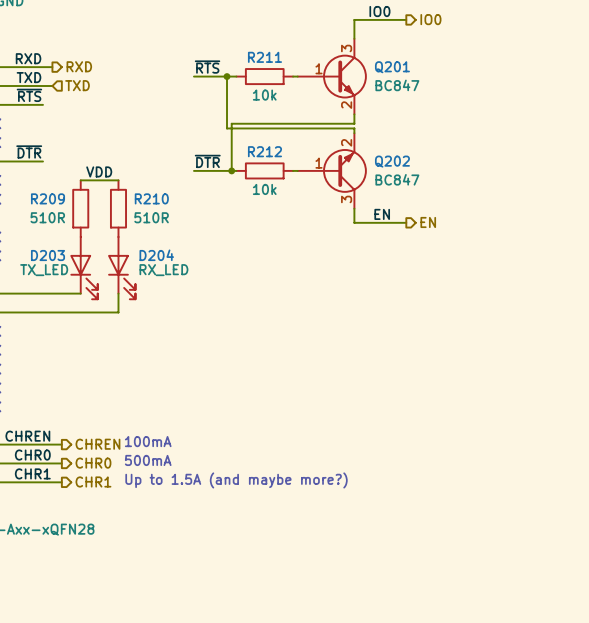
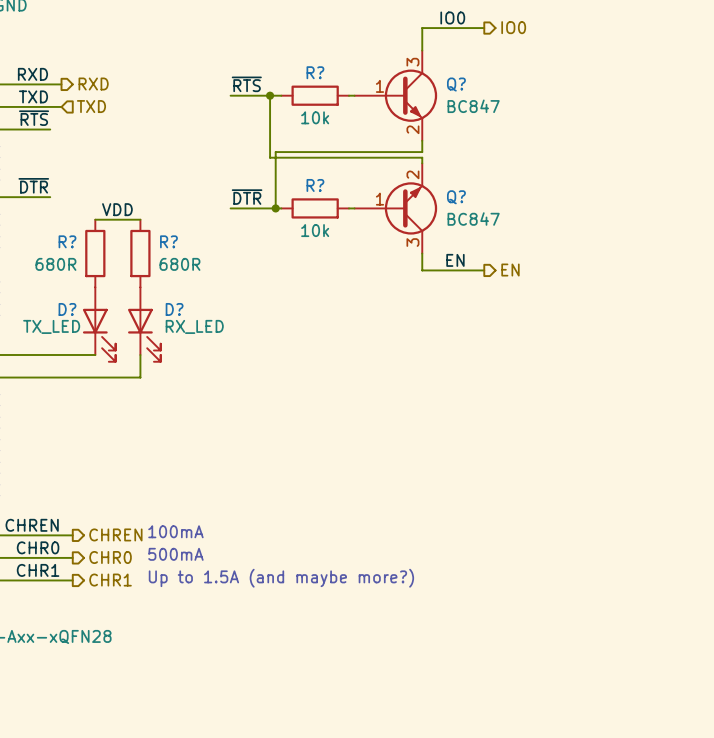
R211 name: R211 (264, 57) -> R? (315, 72)
Q201 name: Q201 (392, 67) -> Q? (456, 84)
R212 name: R212 (264, 151) -> R? (315, 185)
Q202 name: Q202 (392, 161) -> Q? (456, 197)
R209 name: R209 (48, 198) -> R? (67, 241)
R210 name: R210 (151, 198) -> R? (168, 241)
R209 value: 510R (47, 217) -> 680R (55, 264)
R210 value: 510R (151, 217) -> 680R (179, 264)
D203 name: D203 (48, 255) -> D? (67, 309)
D204 name: D204 (156, 255) -> D? (174, 309)

